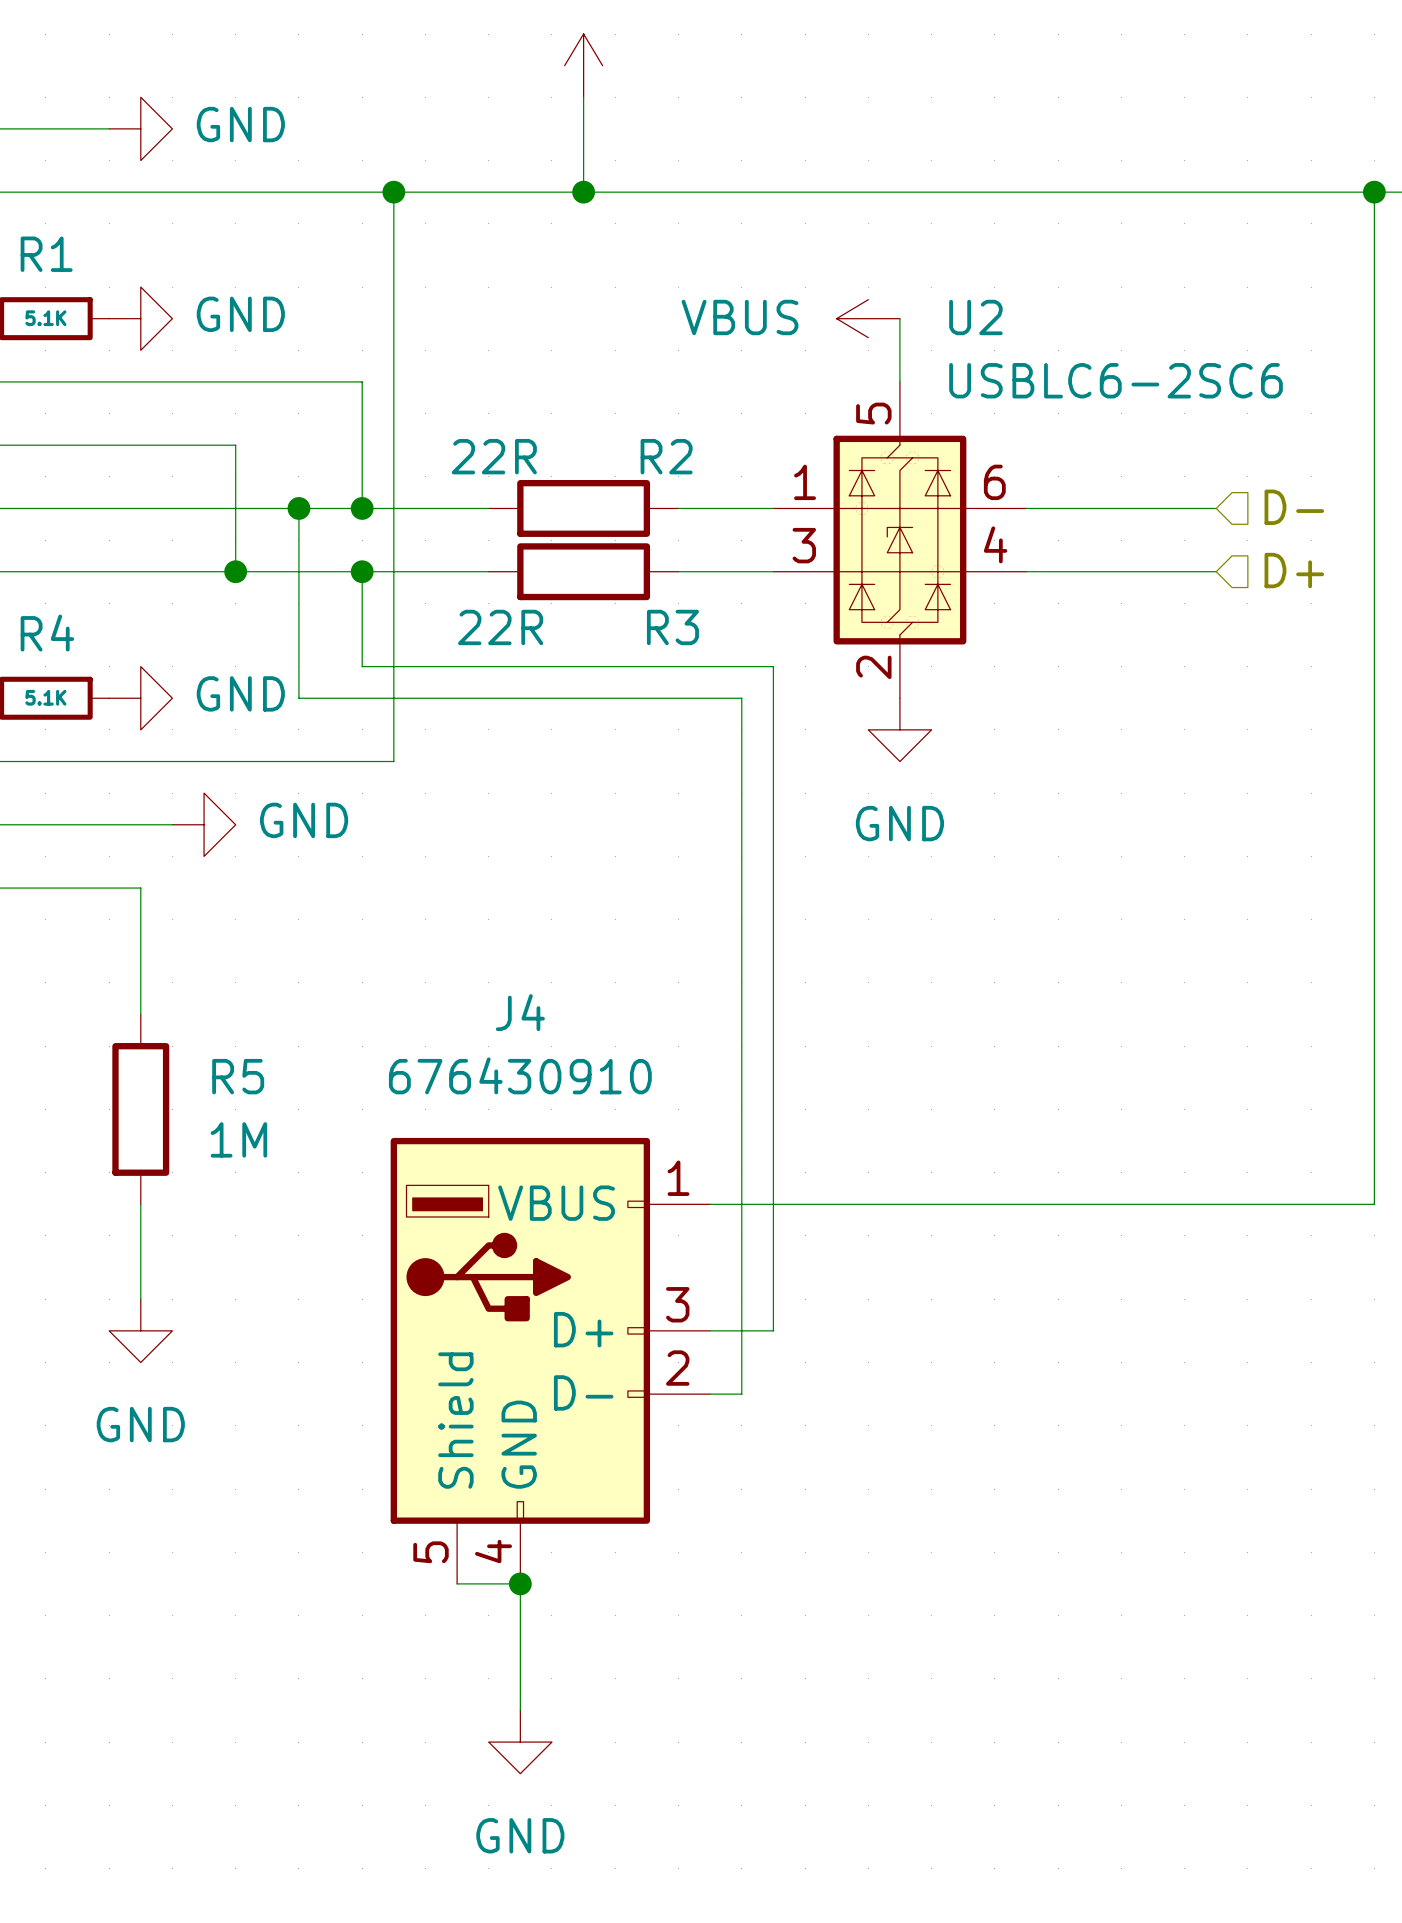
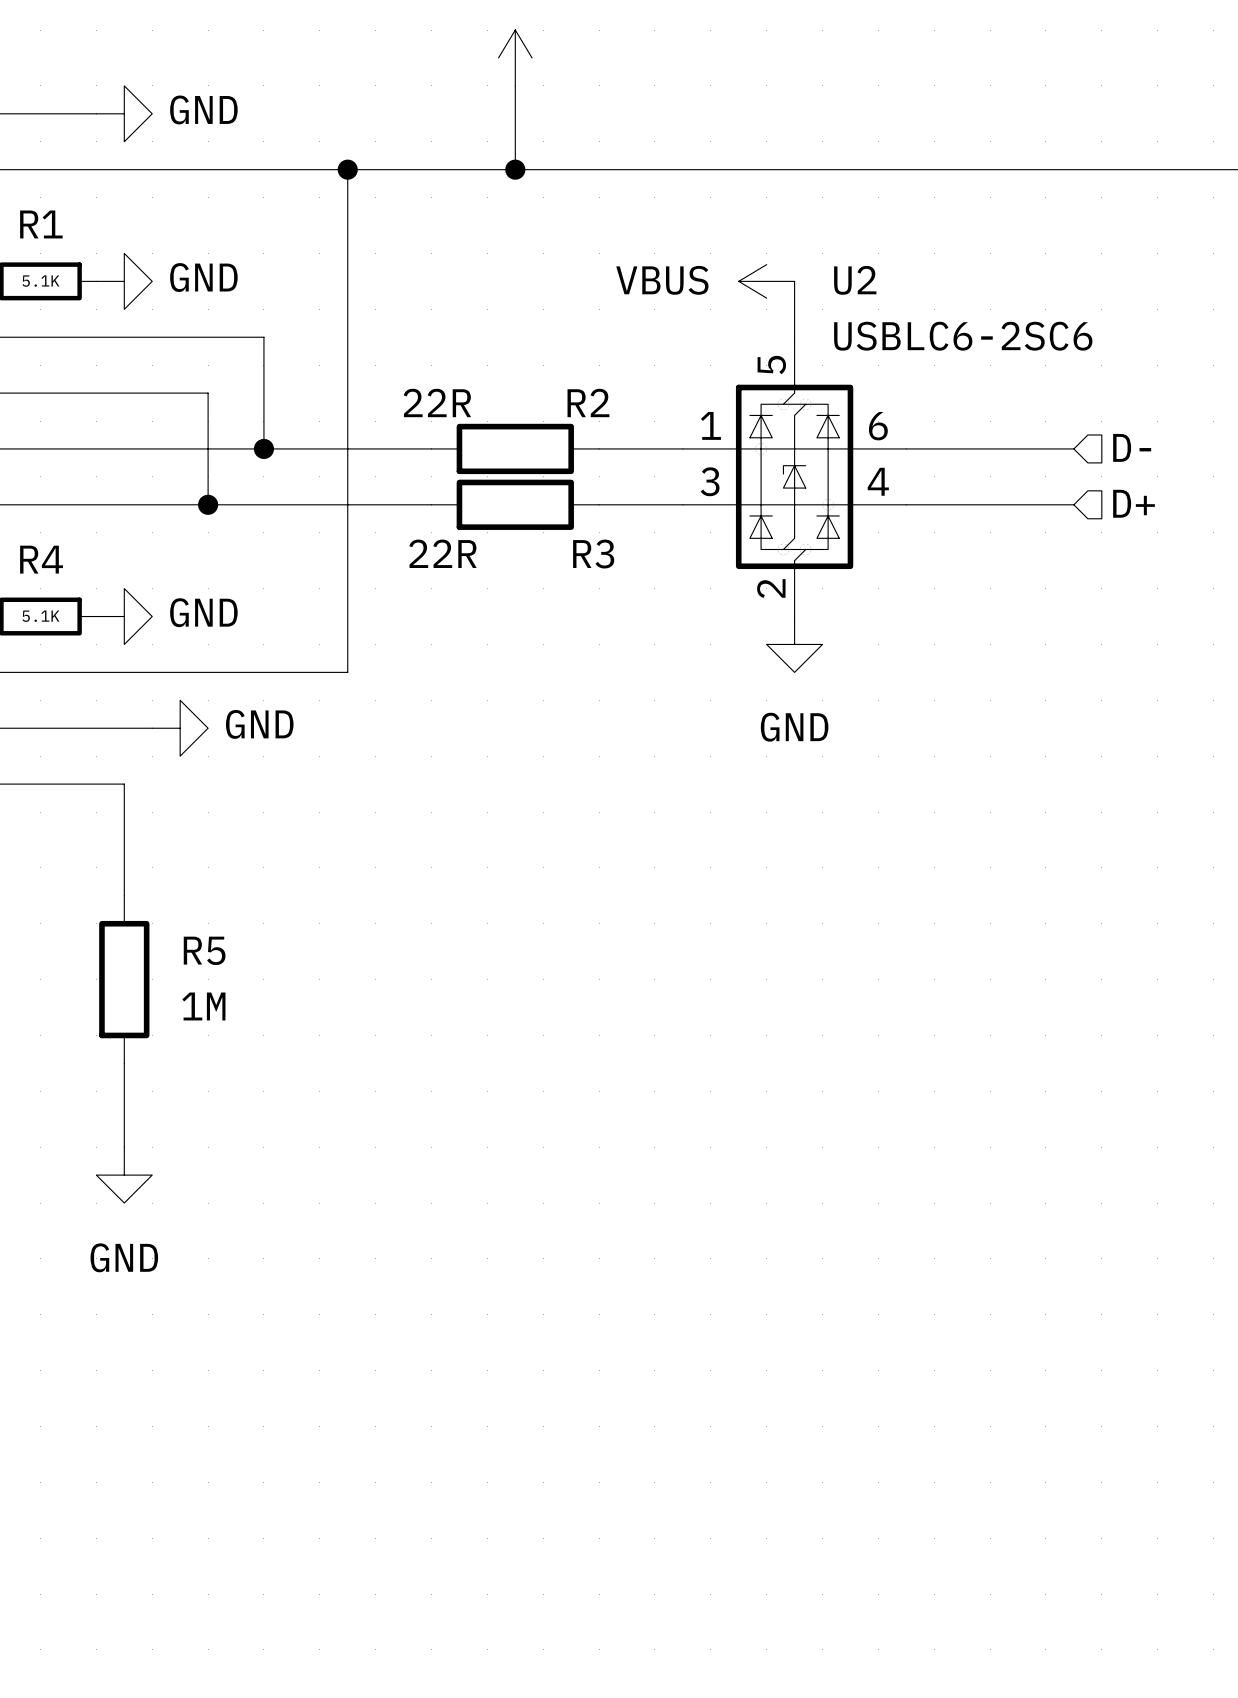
wire: (1374, 192) (1374, 1204) (710, 1204) -> none
junction: (1374, 192) -> none
wire: (298, 381) (362, 381) (362, 508) -> (263, 337) (263, 448)
wire: (298, 508) (298, 698) (741, 698) (741, 1394) (710, 1394) -> none
junction: (362, 508) -> none
wire: (362, 571) (362, 666) (773, 666) (773, 1330) (710, 1330) -> none
junction: (362, 571) -> none
J4: 676430910 (550, 1360) -> none
wire: (457, 1583) (520, 1583) (520, 1710) -> none
junction: (520, 1583) -> none
power symbol: GND (520, 1742) -> none

